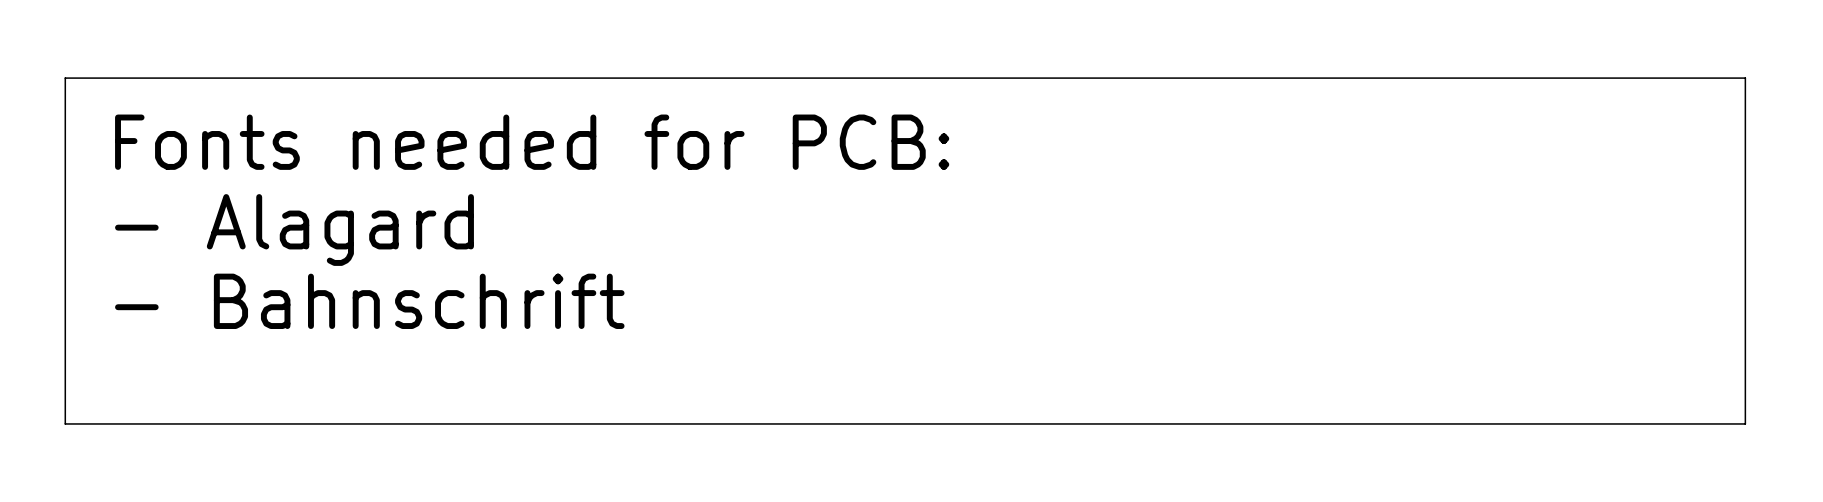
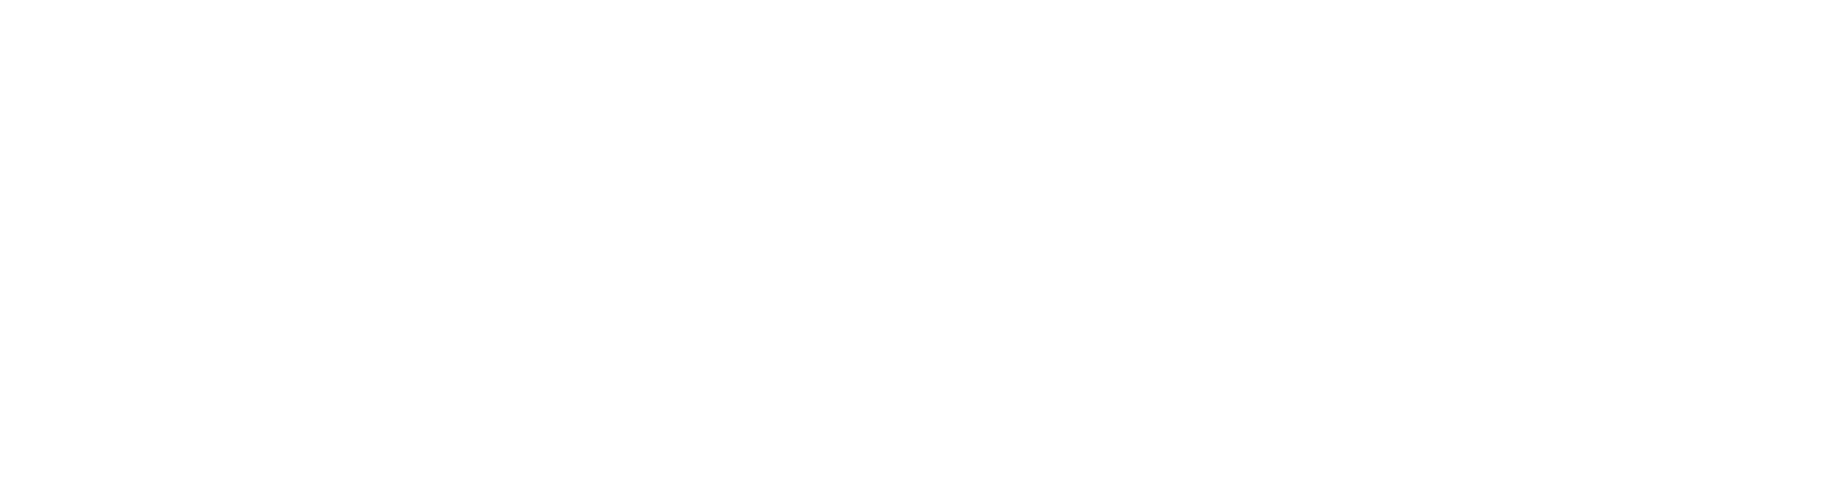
line: (65, 78) (1745, 78) (1745, 423) (65, 423) (65, 78) -> none
text: Fonts needed for PCB: (532, 142) -> none
text: - Alagard (294, 229) -> none
text: - Bahnschrift (369, 301) -> none

